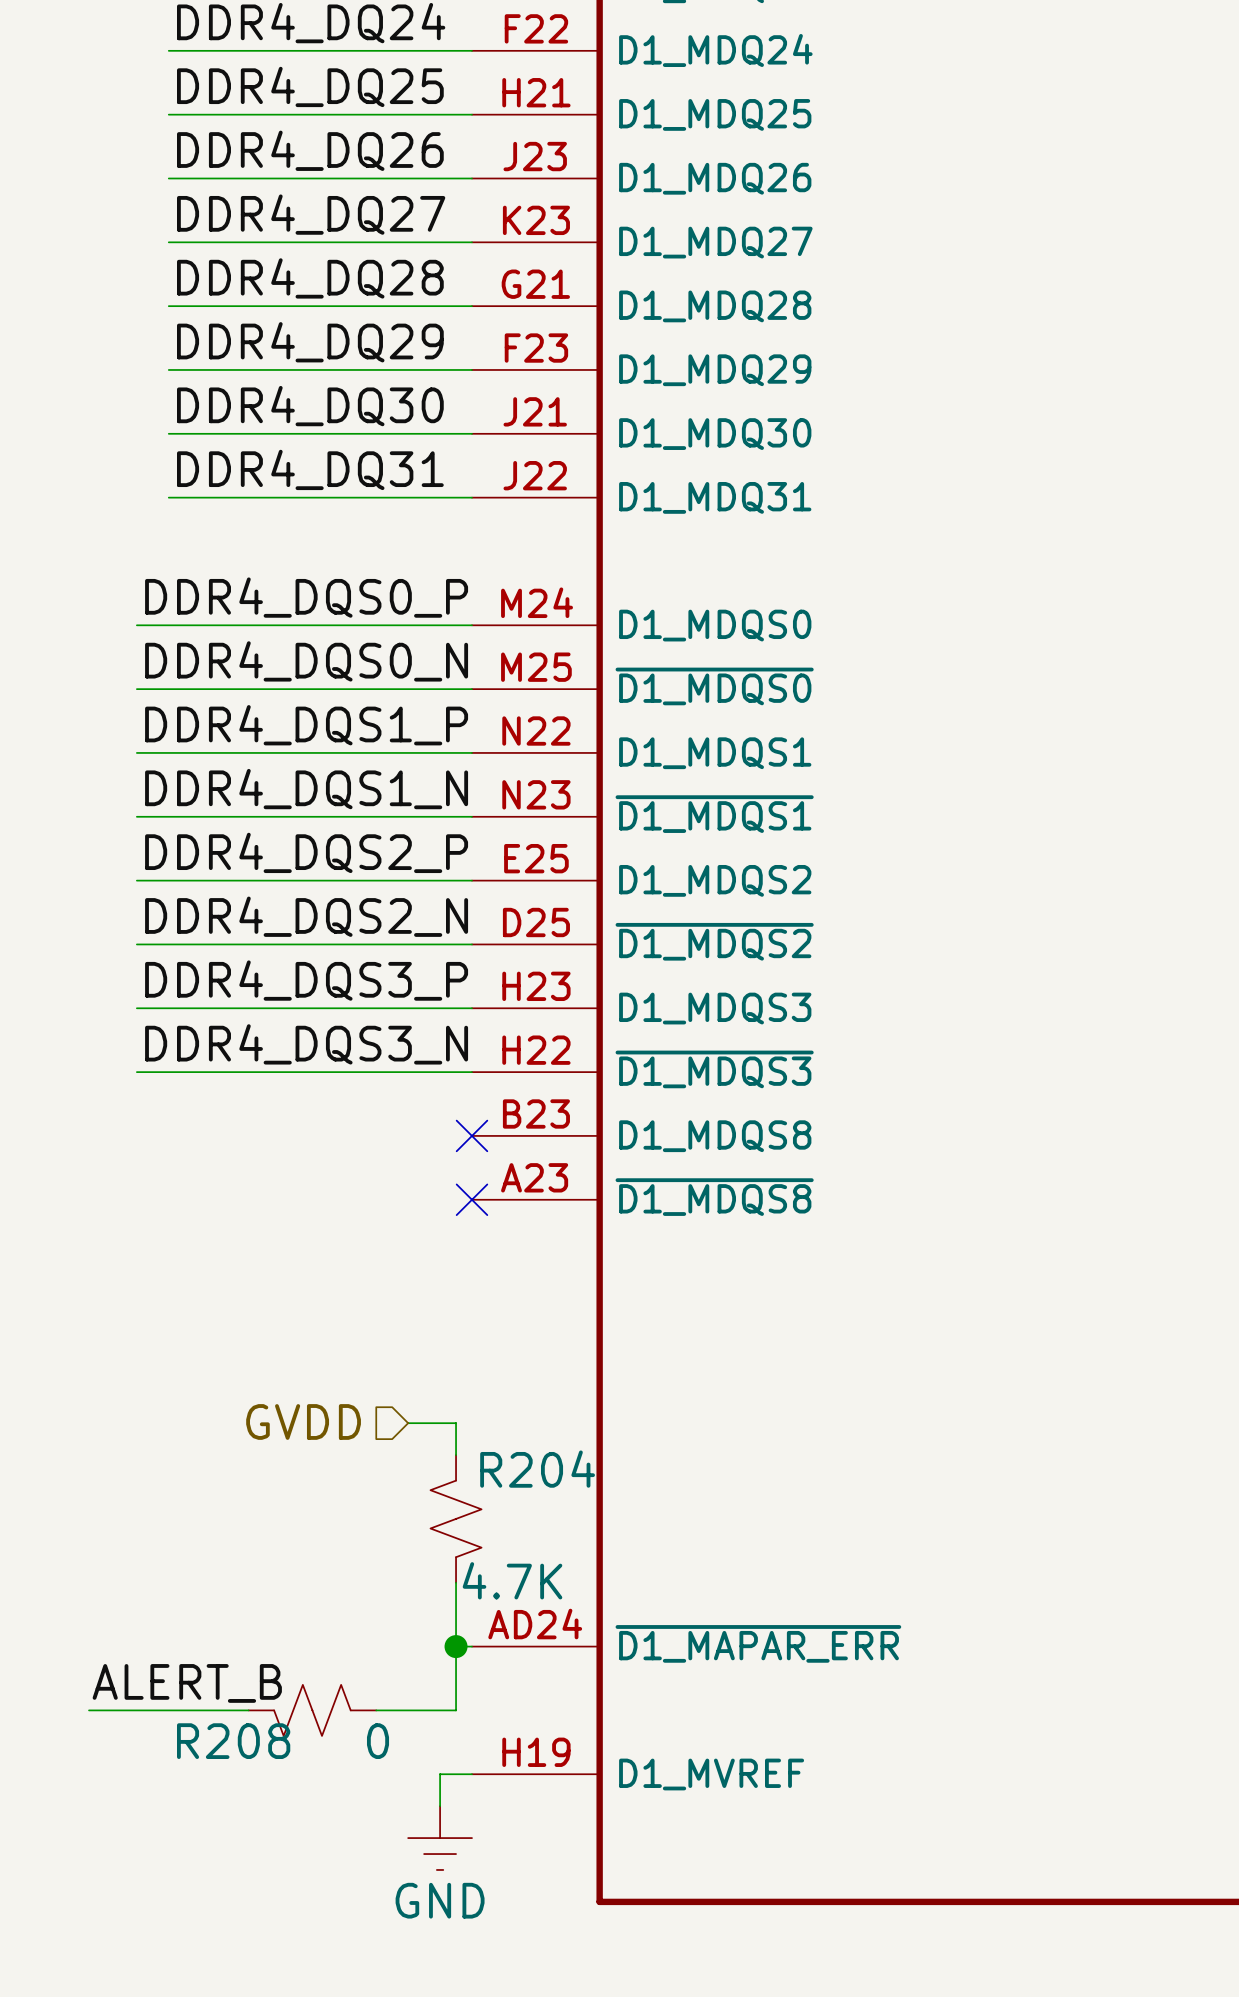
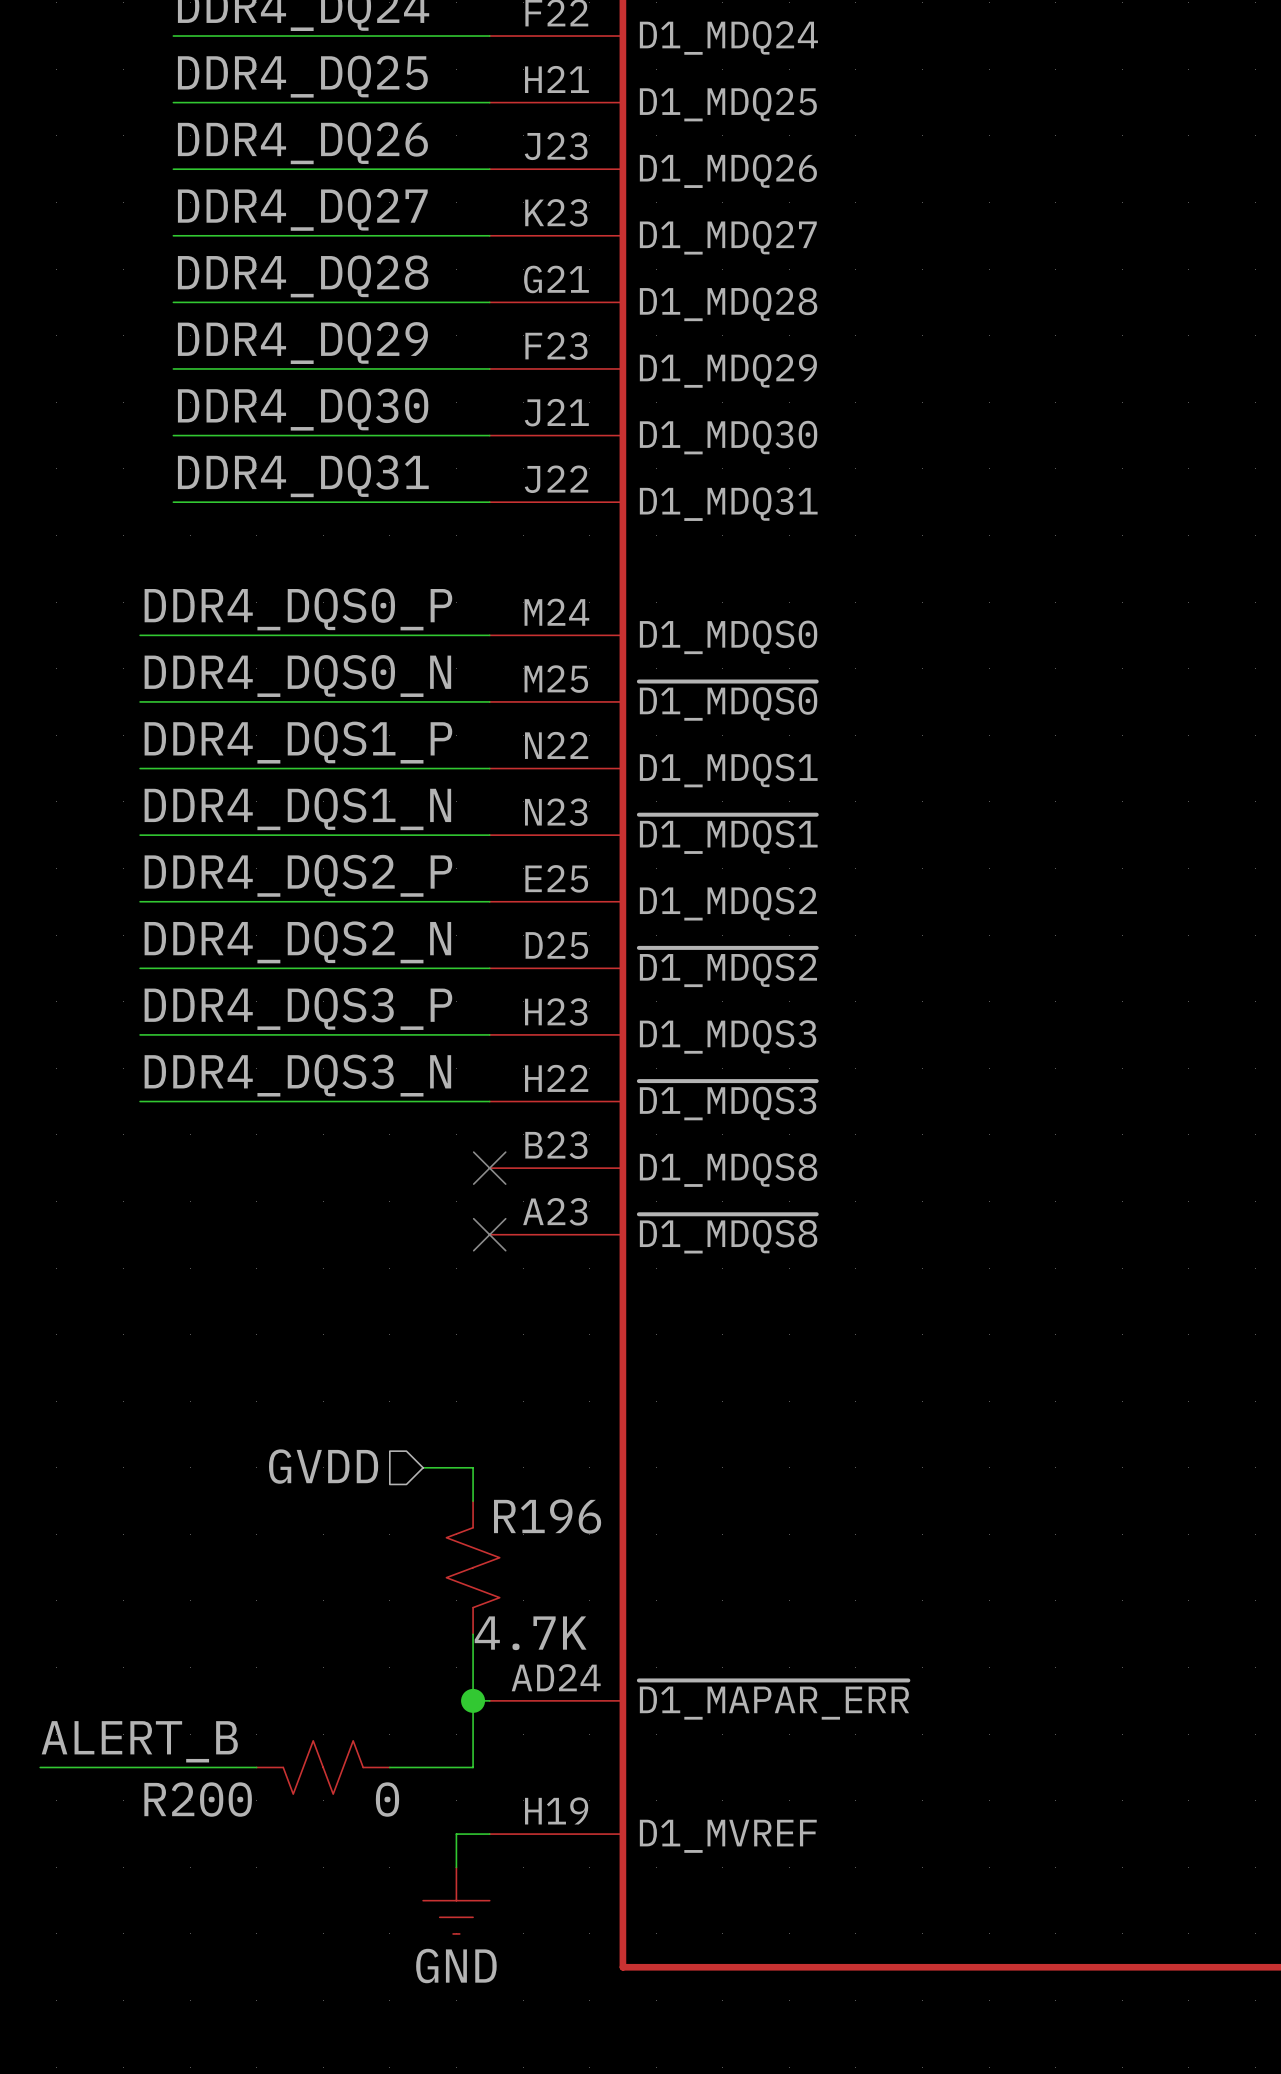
R204 name: R204 (537, 1469) -> R196 (547, 1516)
label position: ALERT_B (187, 1683) -> ALERT_B (139, 1741)
wire: none -> (40, 1767) (90, 1767)
R208 name: R208 (233, 1741) -> R200 (198, 1799)

